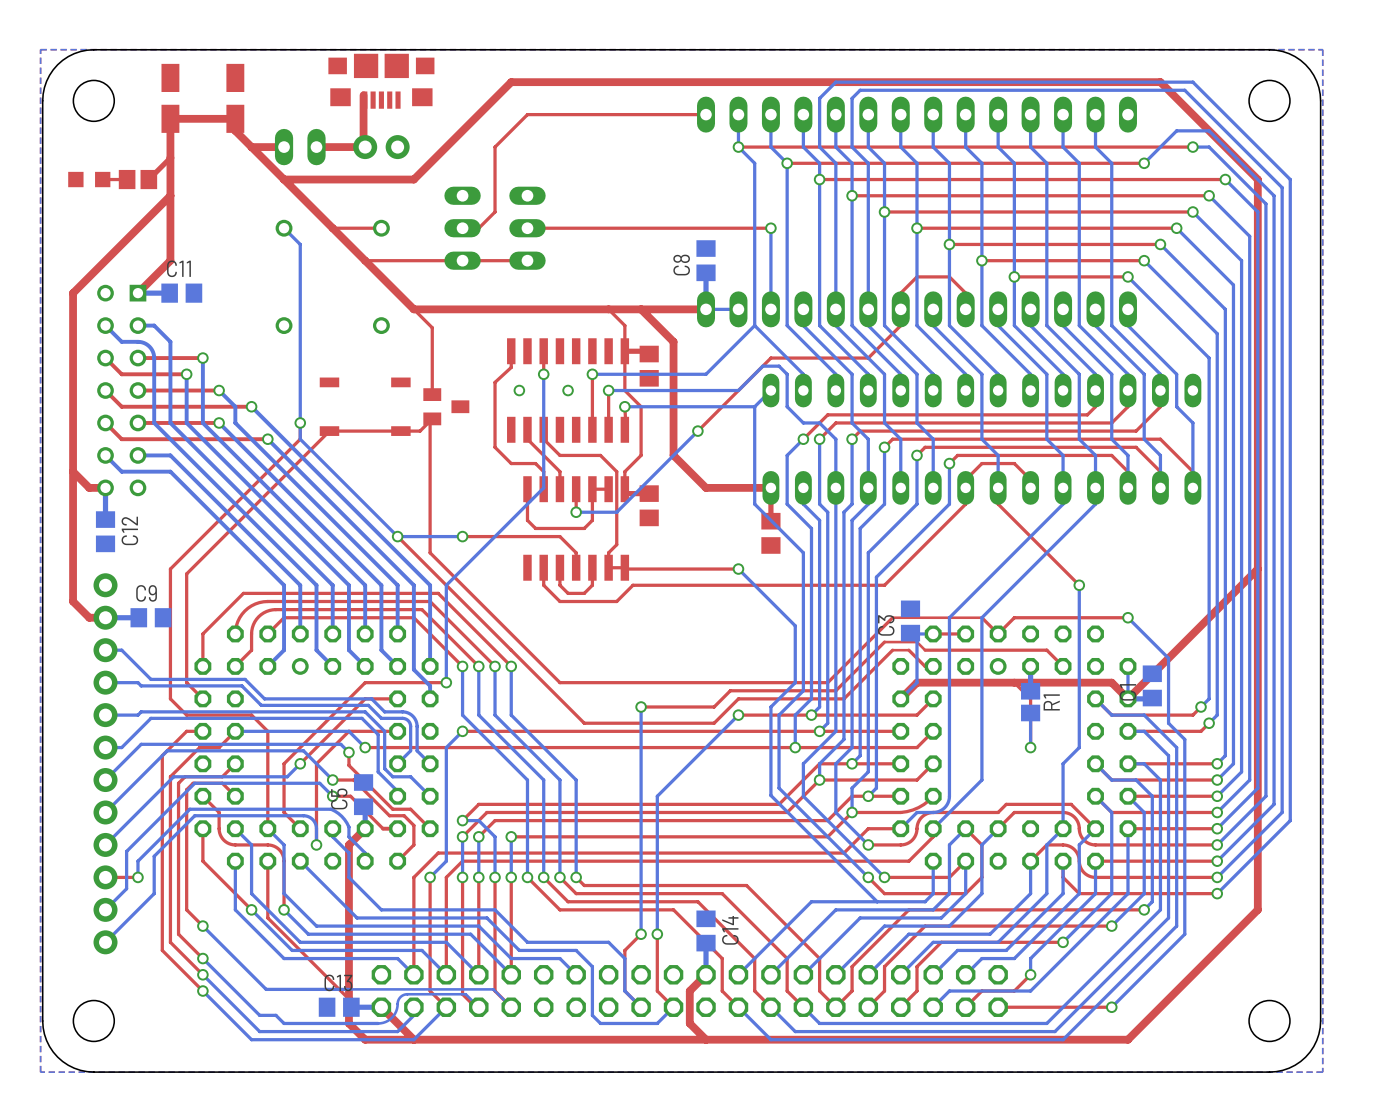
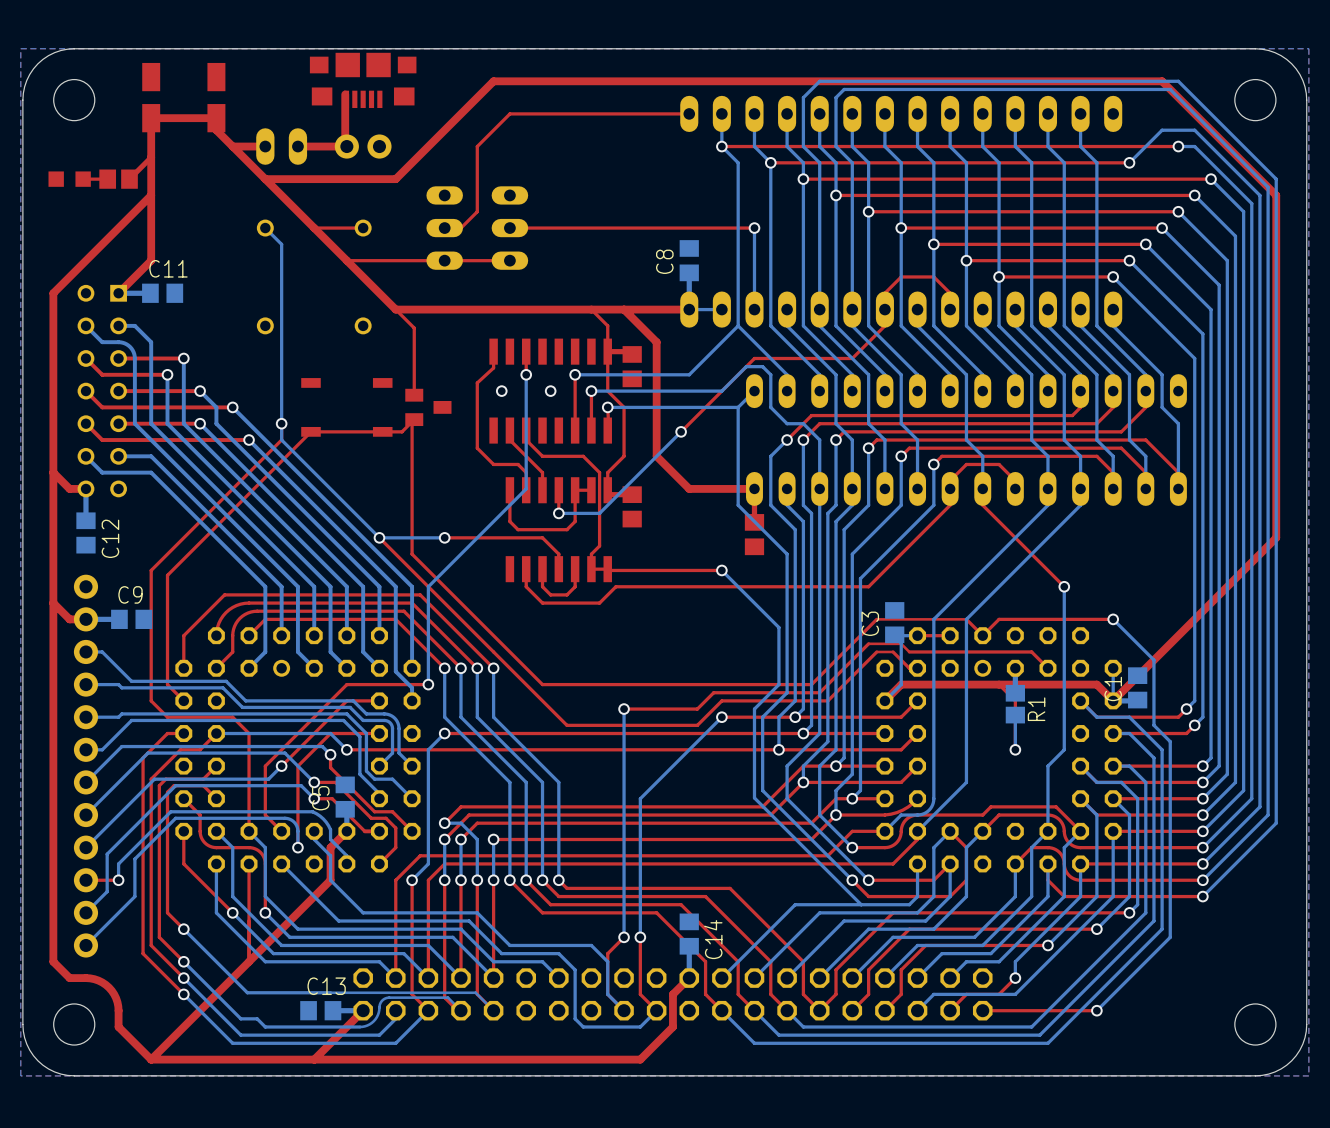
top track: (1160, 82) (1257, 179) (1257, 909) (1127, 1039) (365, 1039) (348, 1023) (348, 877) -> (1145, 81) (1162, 81) (1276, 195) (1276, 537) (1243, 570)
top track: none -> (53, 603) (53, 961) (69, 978) (94, 979) (109, 987) (117, 1002) (118, 1027) (151, 1059)
top track: none -> (330, 880) (151, 1059)
top track: (267, 917) (348, 999) -> (249, 921) (249, 961)
top track: (381, 1007) (413, 1039) -> (363, 1010) (314, 1059)
top track: (689, 1023) (706, 1039) -> (672, 1027) (640, 1059) (151, 1059)

